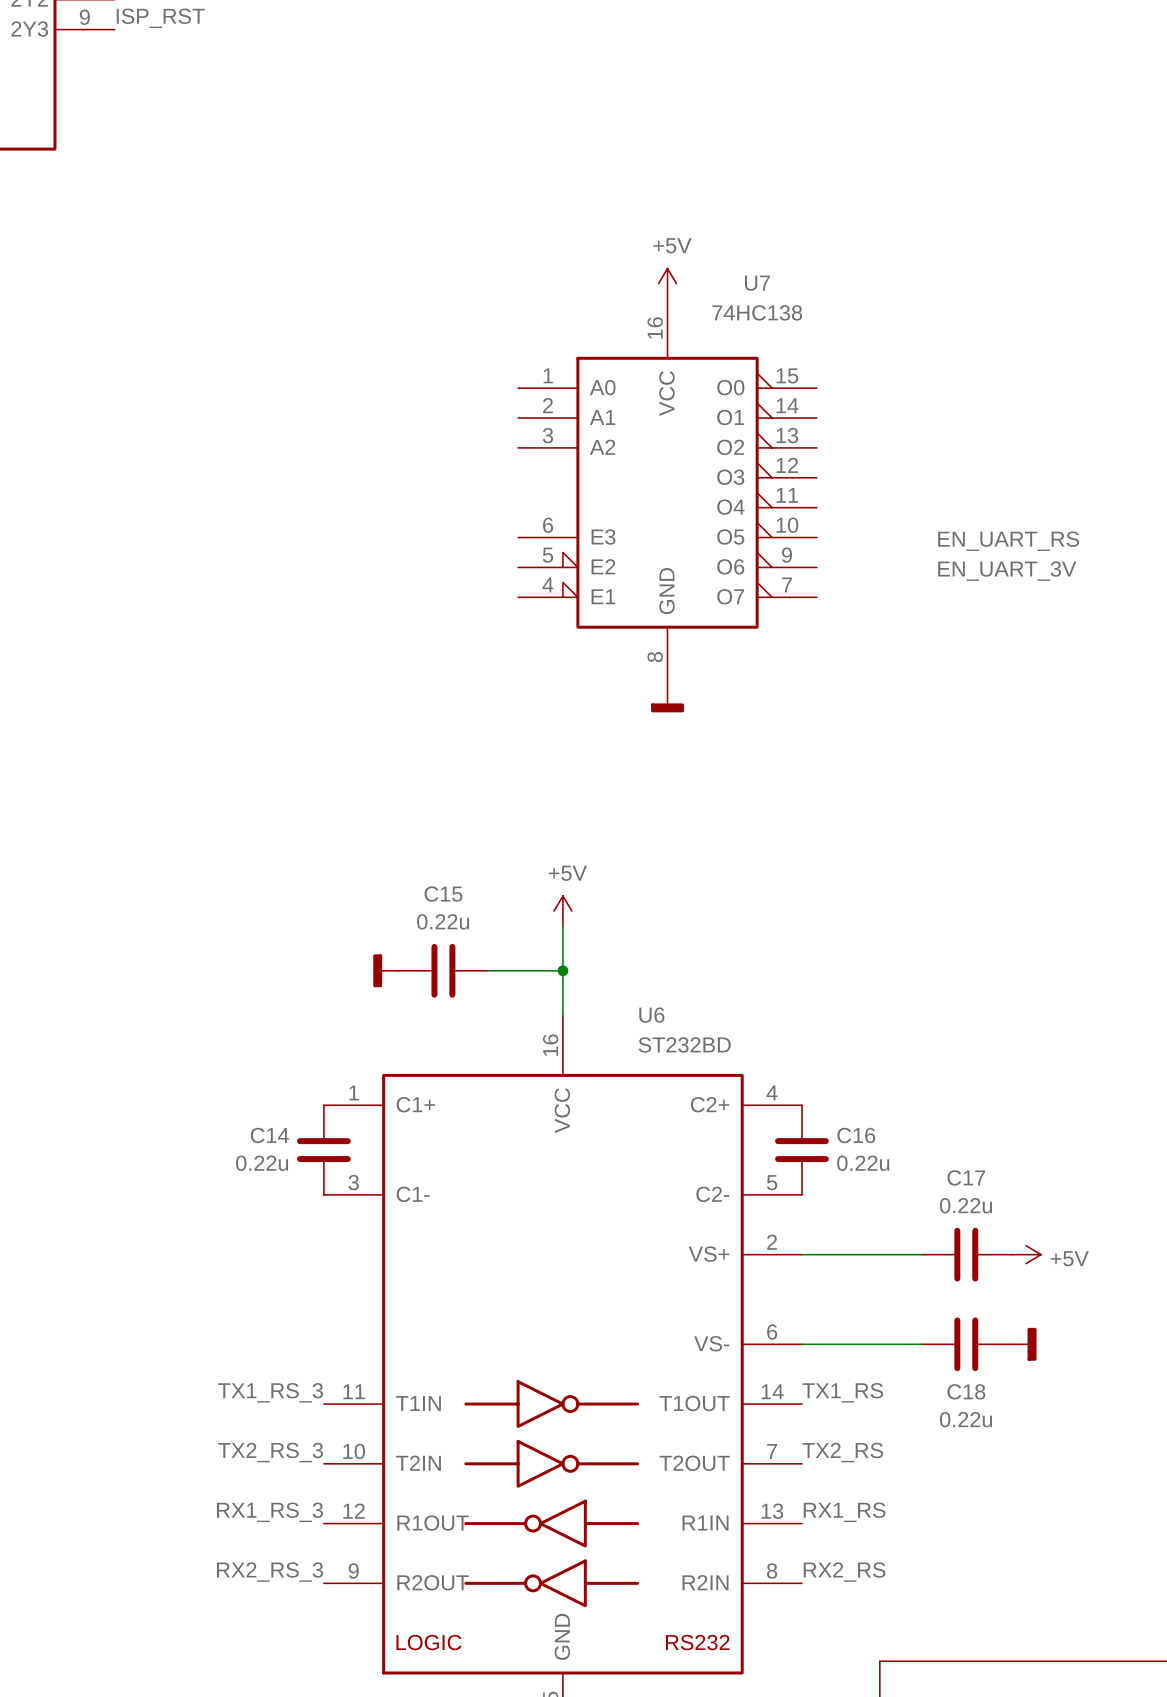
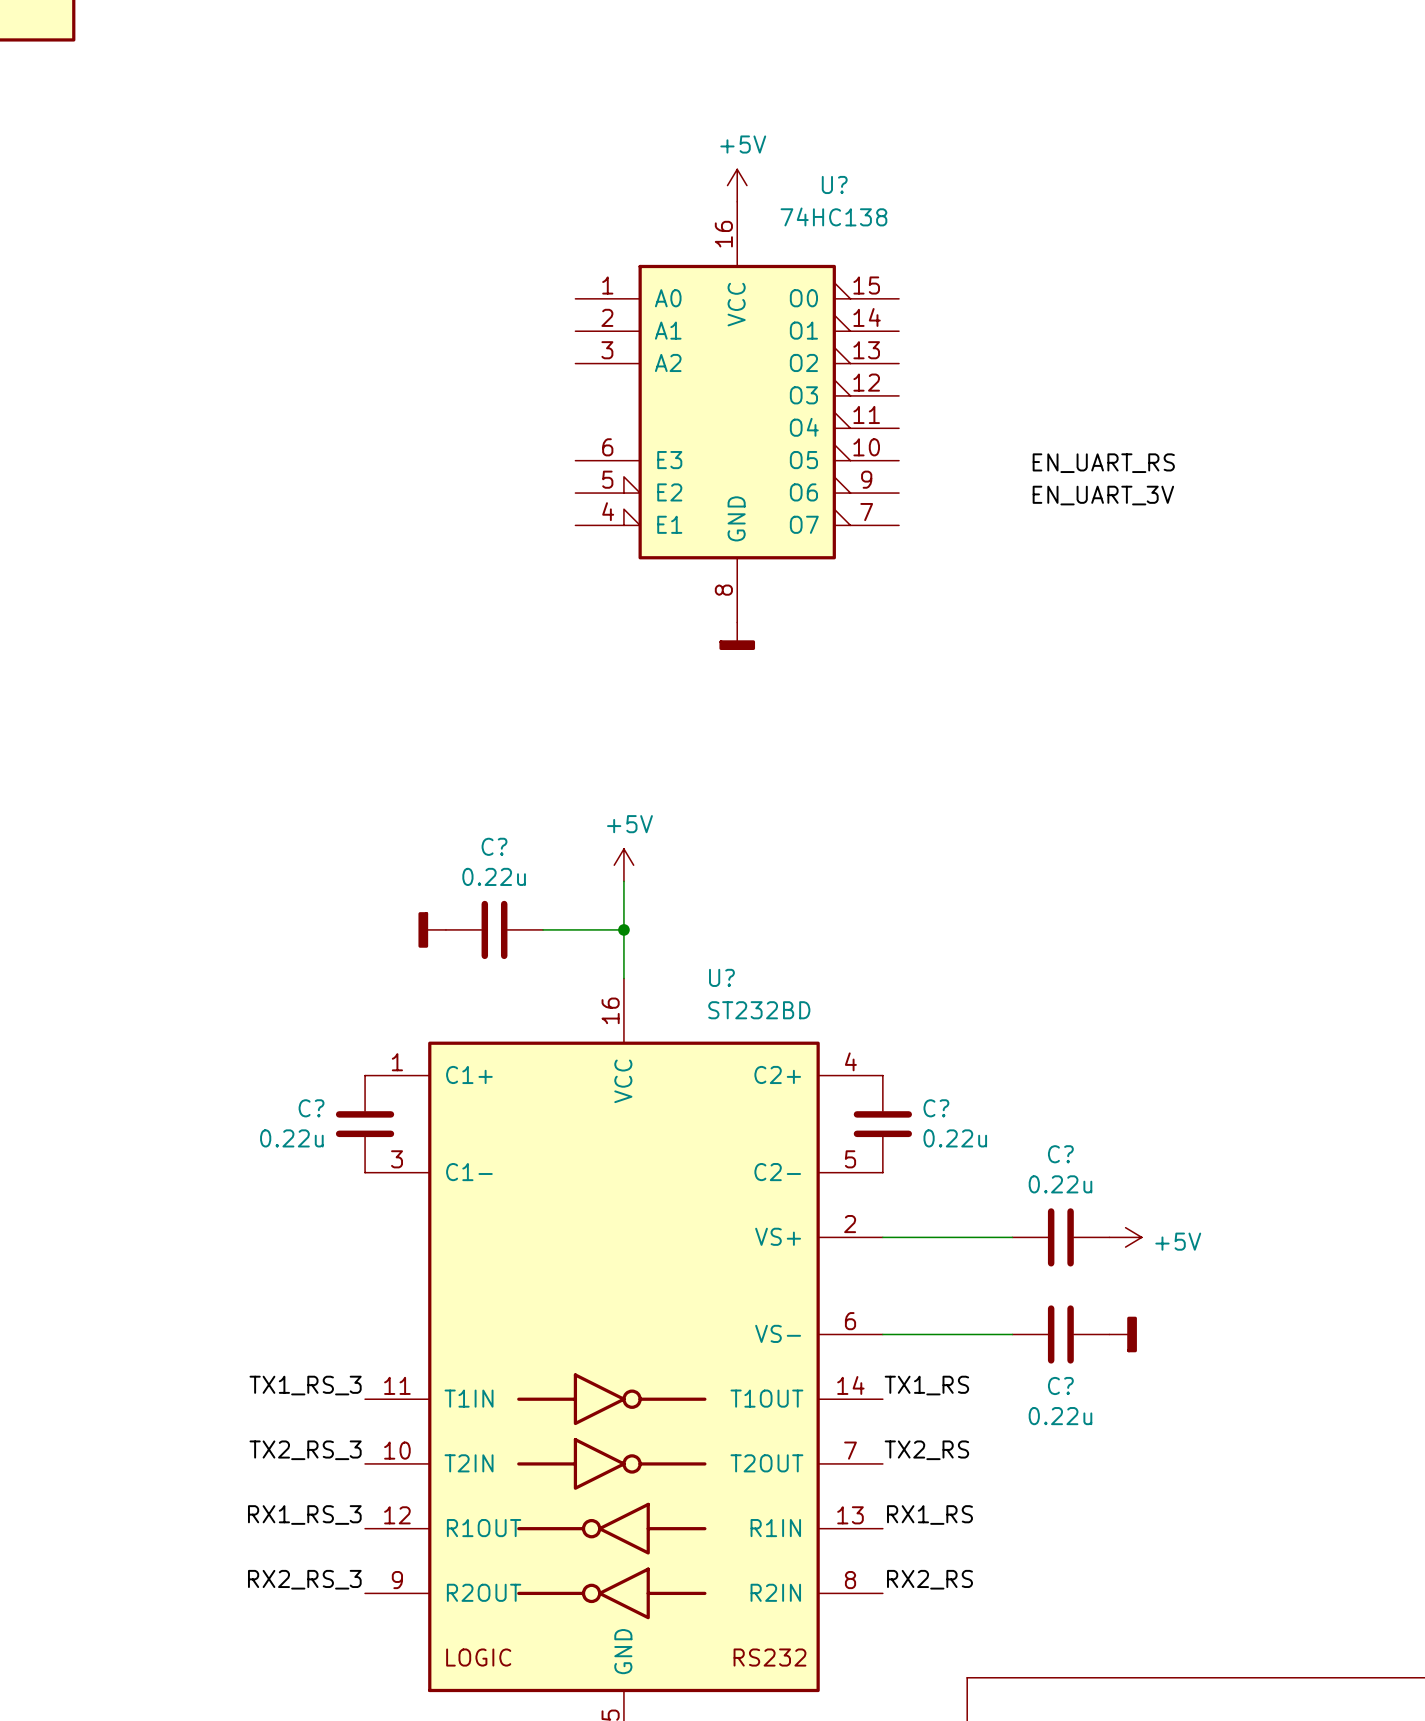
U7 name: U7 (757, 283) -> U? (834, 184)
C15 name: C15 (443, 894) -> C? (494, 846)
U6 name: U6 (651, 1015) -> U? (721, 977)
C14 name: C14 (269, 1135) -> C? (311, 1108)
C16 name: C16 (856, 1135) -> C? (936, 1108)
C17 name: C17 (966, 1177) -> C? (1060, 1154)
C18 name: C18 (966, 1391) -> C? (1060, 1385)

